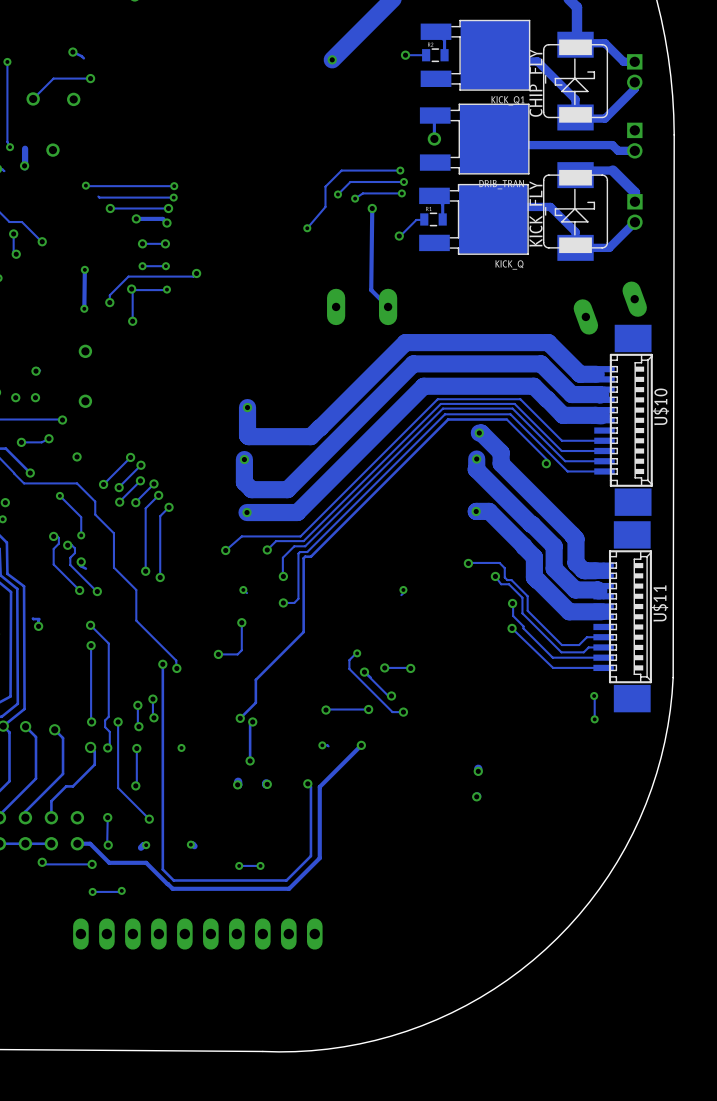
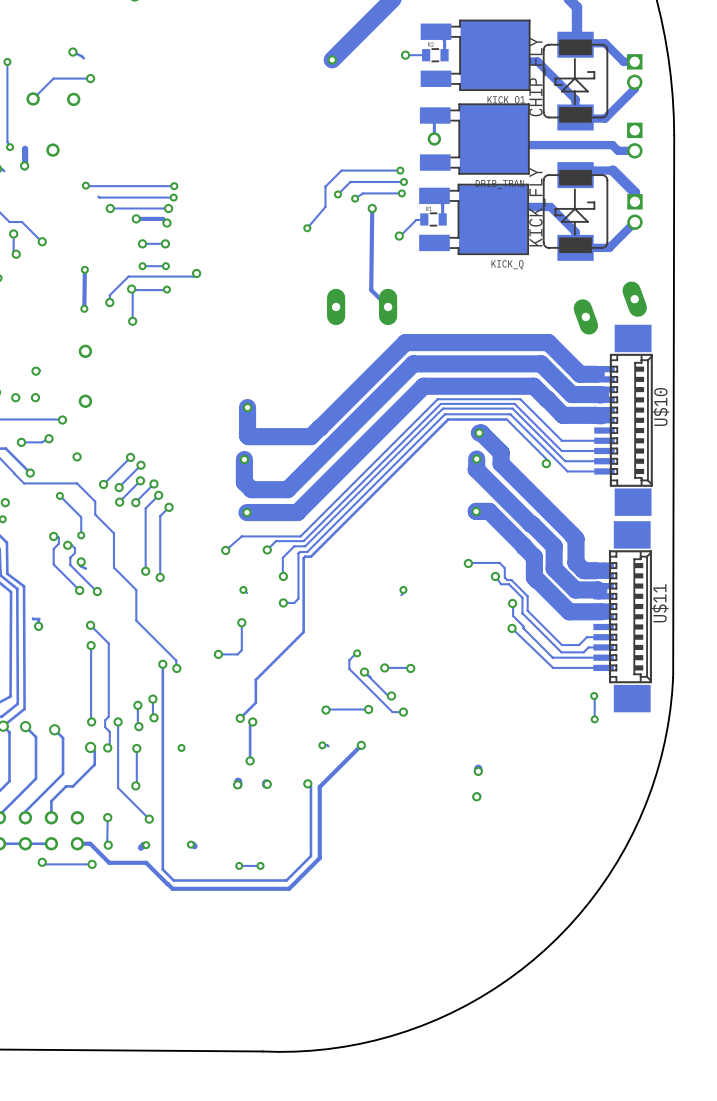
track: (121, 890) (92, 891) -> none
via: (121, 890) -> none
via: (92, 891) -> none
part: (197, 934) -> none

